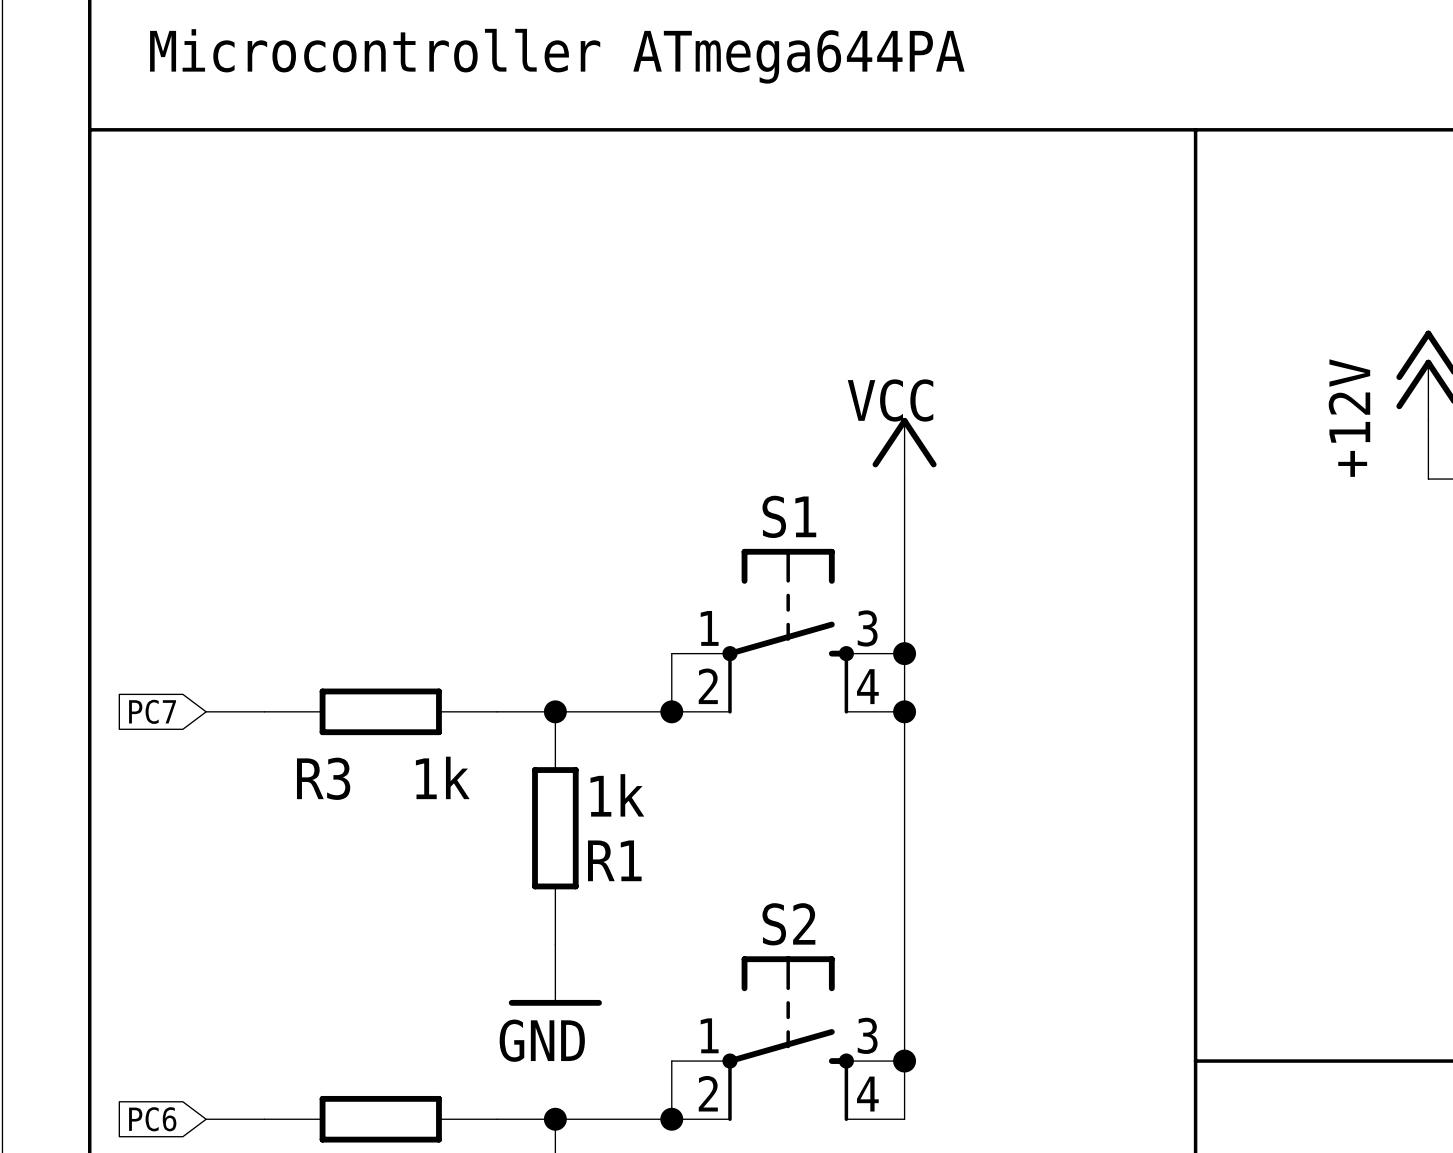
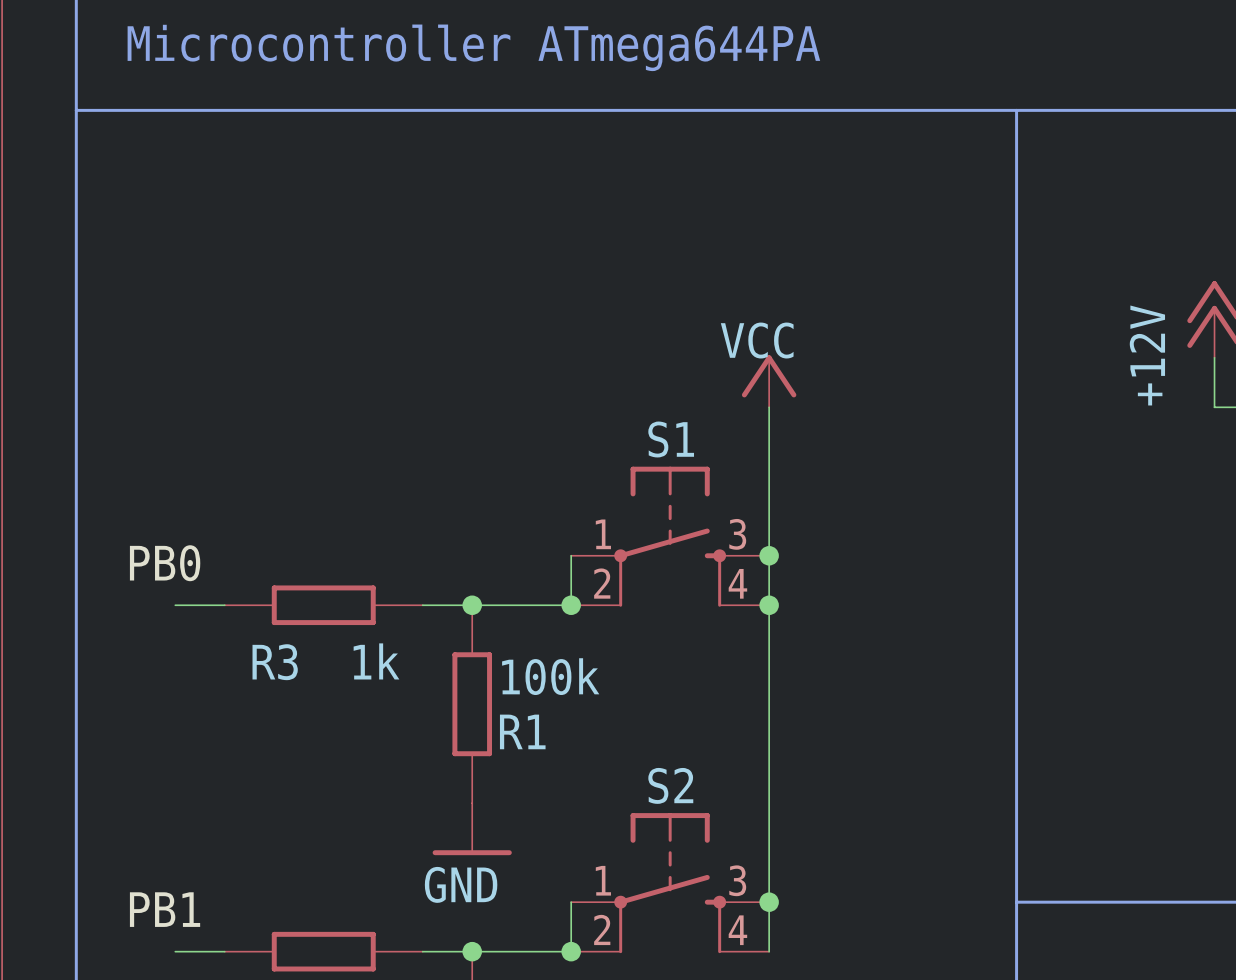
label: none -> PB0 (165, 563)
global label: PC7 (152, 711) -> none
R1 value: 1k (617, 795) -> 100k (550, 676)
label: none -> PB1 (165, 909)
global label: PC6 (152, 1119) -> none

